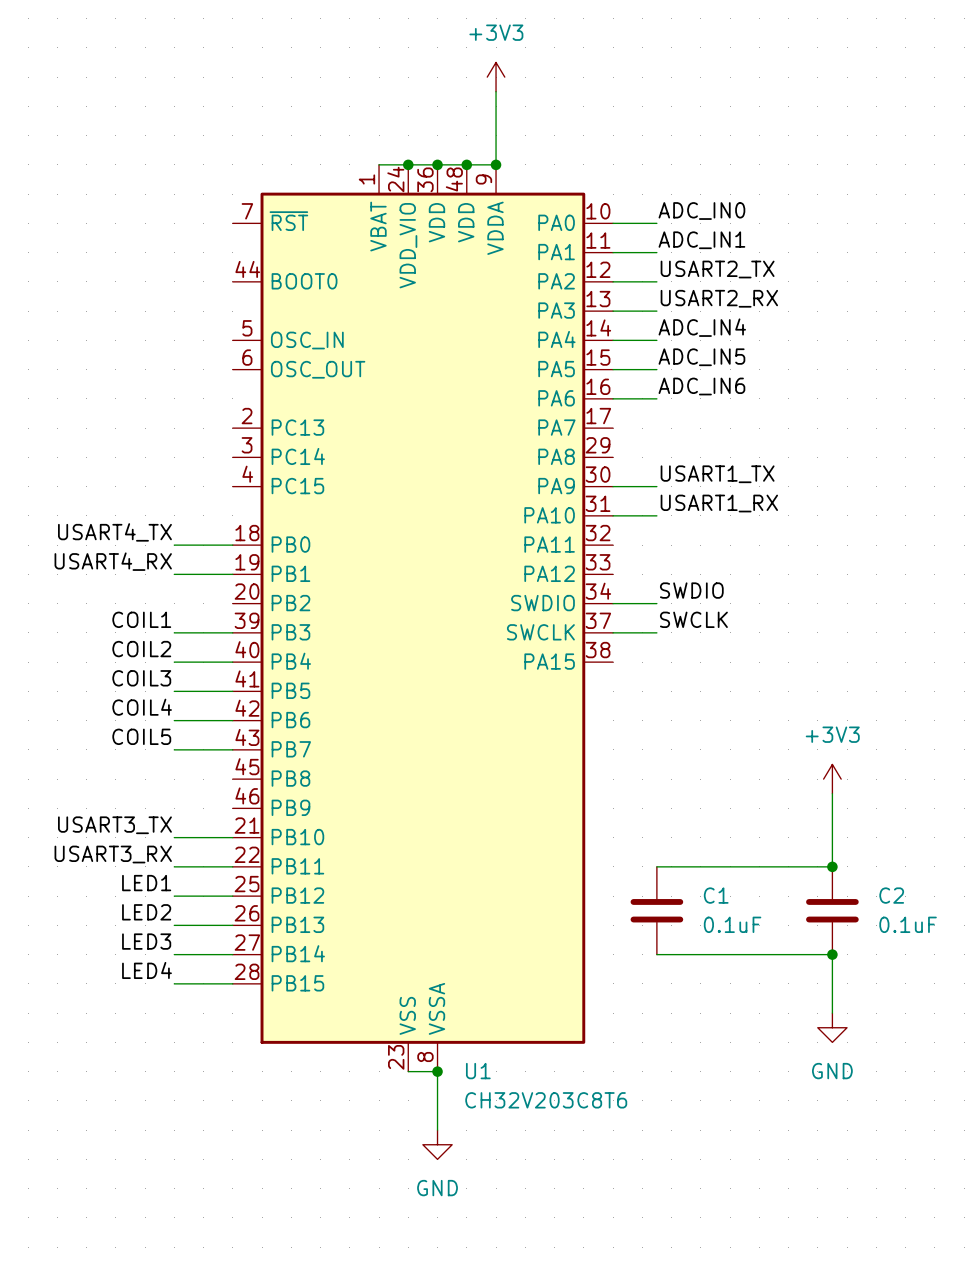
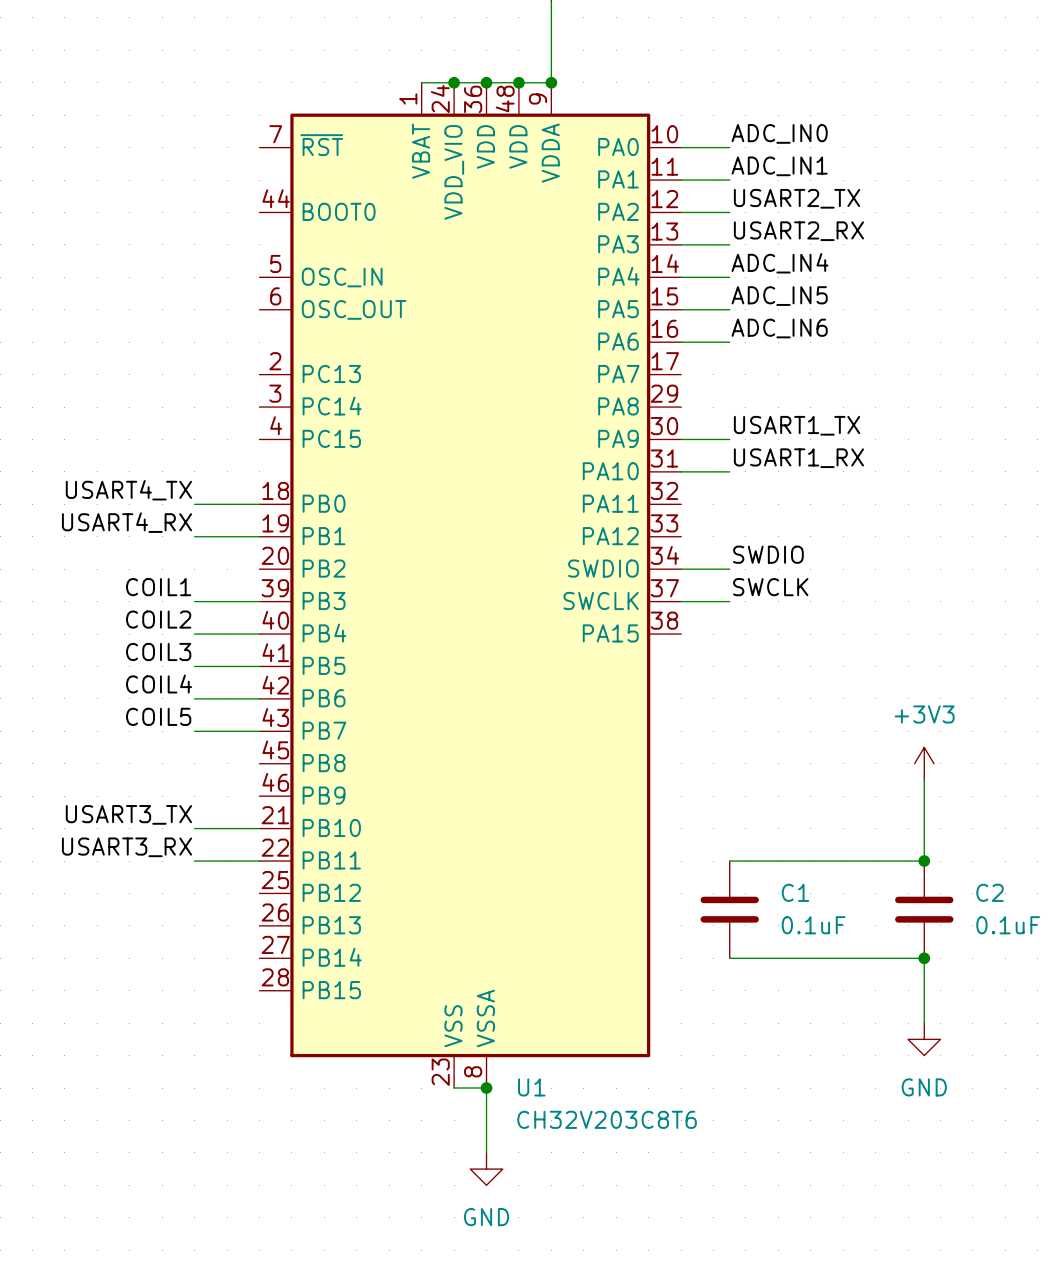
label: LED1 (146, 883) -> none
wire: (174, 896) (232, 896) -> none
label: LED2 (146, 912) -> none
wire: (174, 925) (232, 925) -> none
label: LED3 (146, 941) -> none
wire: (174, 954) (232, 954) -> none
label: LED4 (147, 970) -> none
wire: (174, 983) (232, 983) -> none

